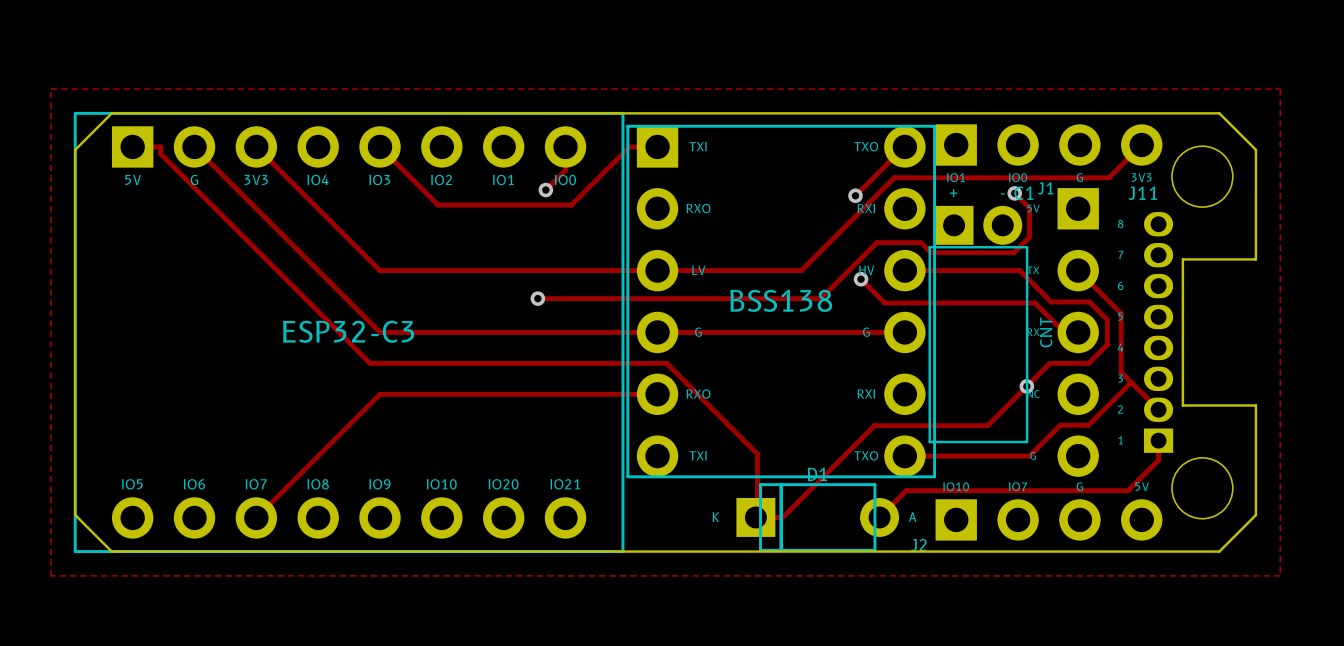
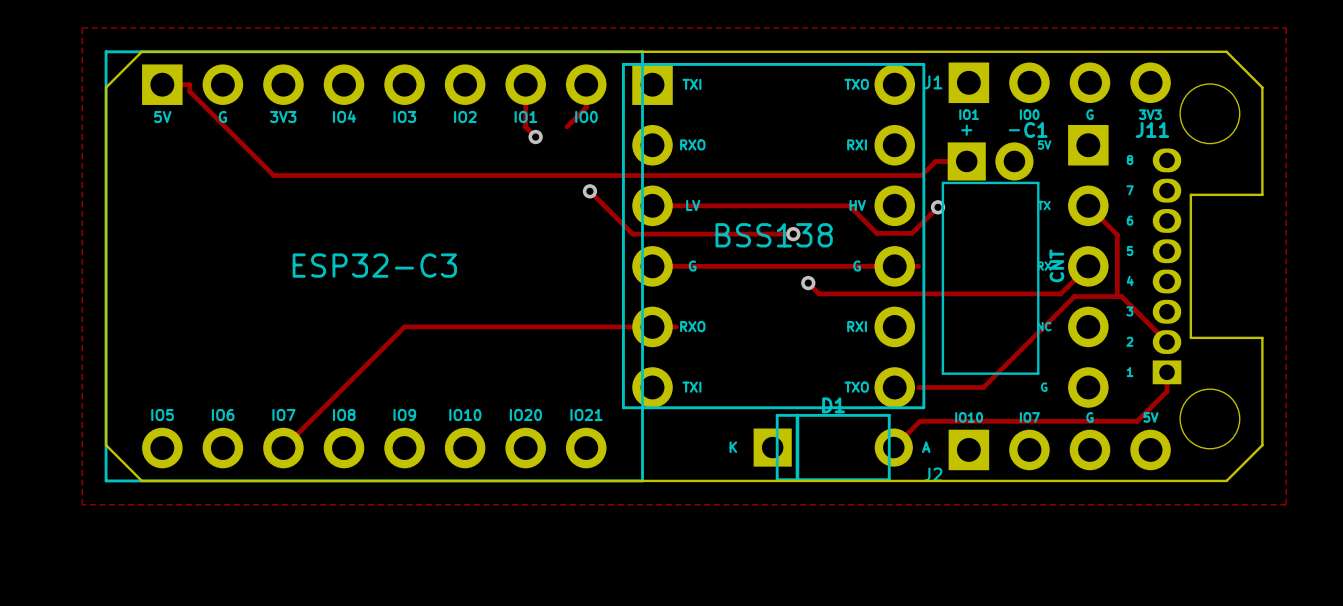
track: (1141, 145) (1108, 177) (894, 177) (801, 270) -> (938, 207) (911, 233) (876, 233) (849, 205) (817, 205)
track: (194, 146) (380, 332) (633, 332) -> none
track: (256, 146) (380, 270) (633, 270) -> none
track: (380, 146) (438, 205) (571, 205) (629, 146) (657, 146) -> none
track: none -> (525, 84) (525, 127) (535, 137)
text position: TXI (698, 146) -> TXI (691, 84)
text position: TXO (866, 146) -> TXO (856, 84)
track: (904, 146) (855, 195) -> none
J1 name position: J1 (1045, 188) -> J1 (933, 82)
via position: (545, 190) -> (535, 137)
track: (1014, 193) (1029, 208) (1029, 237) (1013, 252) (930, 252) (920, 242) (876, 242) (820, 298) (537, 298) -> none
via: (1014, 193) -> none
via: (855, 195) -> none
text position: RXO (698, 208) -> RXO (692, 144)
text position: RXI (866, 208) -> RXI (857, 144)
track: (246, 239) (370, 363) (666, 363) (757, 454) (757, 517) -> (273, 175) (921, 175) (935, 161) (961, 161)
track: none -> (589, 191) (632, 234) (793, 234)
via: none -> (589, 191)
text position: LV (698, 270) -> LV (693, 205)
text position: HV (866, 270) -> HV (857, 205)
track: (904, 270) (1019, 270) (1051, 301) (1089, 301) (1107, 319) (1107, 344) (1088, 363) (1049, 363) (987, 425) (874, 425) (782, 517) (755, 517) -> none
via: none -> (938, 207)
track: (861, 279) (884, 303) (1034, 303) (1064, 332) (1078, 332) -> (808, 283) (819, 293) (1060, 293) (1088, 266)
via: (861, 279) -> none
via: (537, 298) -> none
via: none -> (793, 234)
track: (1107, 300) (1121, 313) (1121, 372) -> (1117, 234) (1117, 296)
BSS138 position: (781, 301) -> (773, 236)
text position: G (698, 332) -> G (692, 266)
text position: G (866, 332) -> G (857, 266)
via: none -> (808, 283)
track: (1131, 382) (1088, 425) (1060, 425) (1029, 456) (971, 456) -> (1140, 315) (1121, 296) (1074, 296) (983, 387)
via: (1026, 386) -> none
text position: RXO (698, 393) -> RXO (692, 326)
text position: RXI (866, 393) -> RXI (857, 326)
text position: TXI (698, 455) -> TXI (691, 387)
text position: TXO (866, 455) -> TXO (856, 387)

